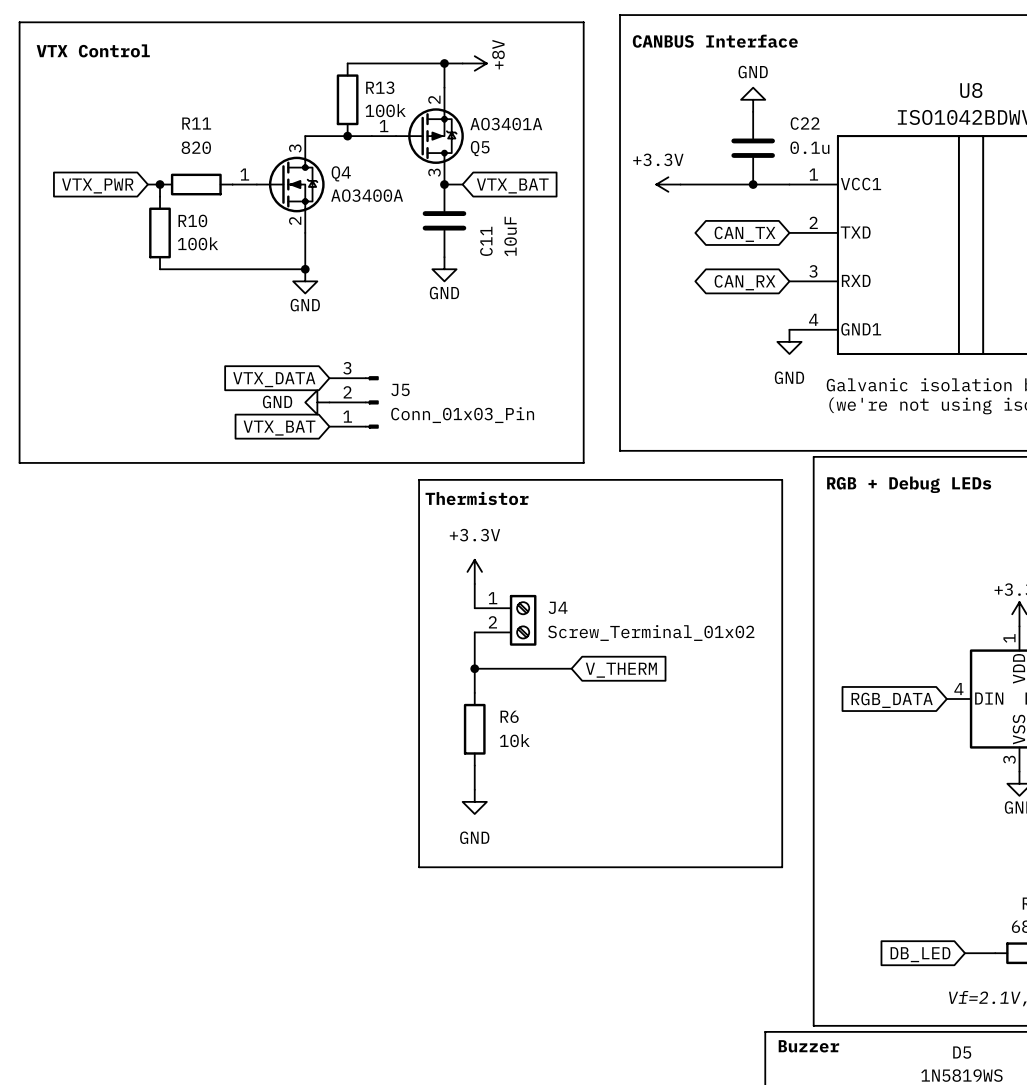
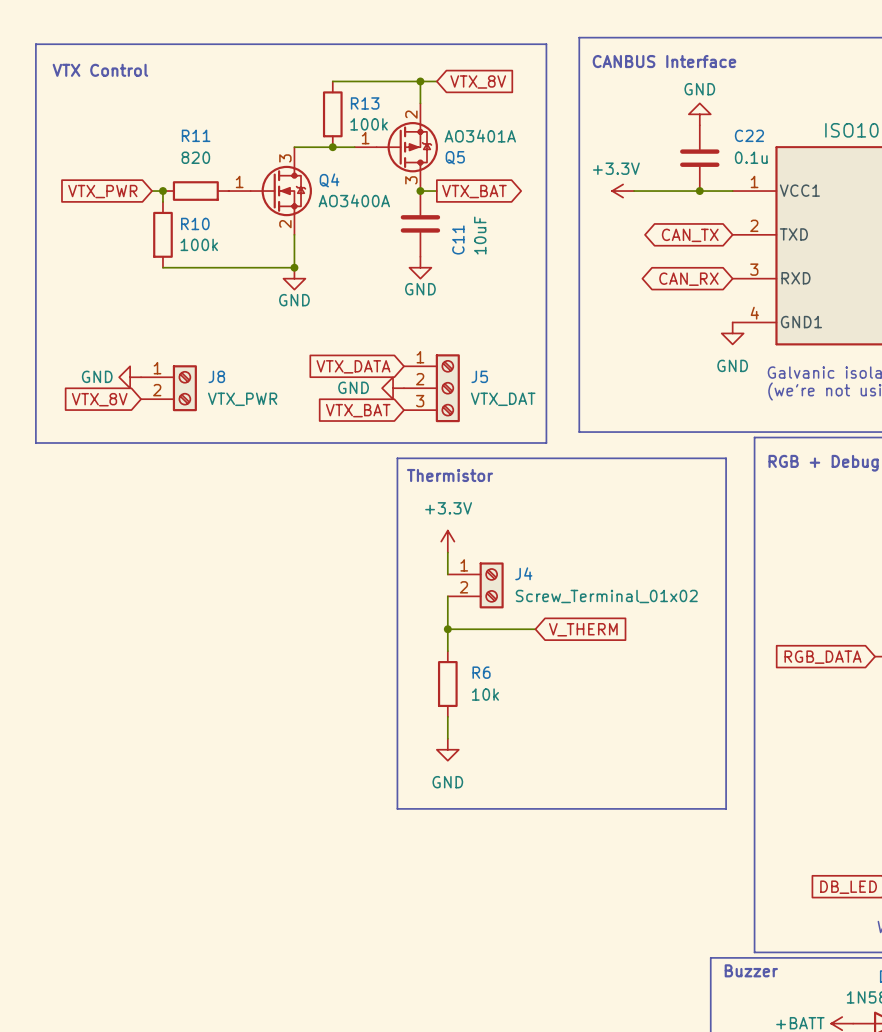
power symbol: +8V (474, 63) -> none
global label: none -> VTX_8V (478, 81)
global label shape: input (512, 185) -> output (474, 191)
J5 symbol: [329, 376, 379, 429] -> [404, 354, 460, 423]
global label position: VTX_DATA (274, 379) -> VTX_DATA (353, 366)
power symbol: none -> GND (130, 377)
J8: none -> VTX_PWR (169, 388)
power symbol position: GND (317, 402) -> GND (393, 388)
global label: none -> VTX_8V (99, 399)
J5 value: Conn_01x03_Pin (462, 415) -> VTX_DAT (503, 399)
global label position: VTX_BAT (279, 428) -> VTX_BAT (358, 410)

